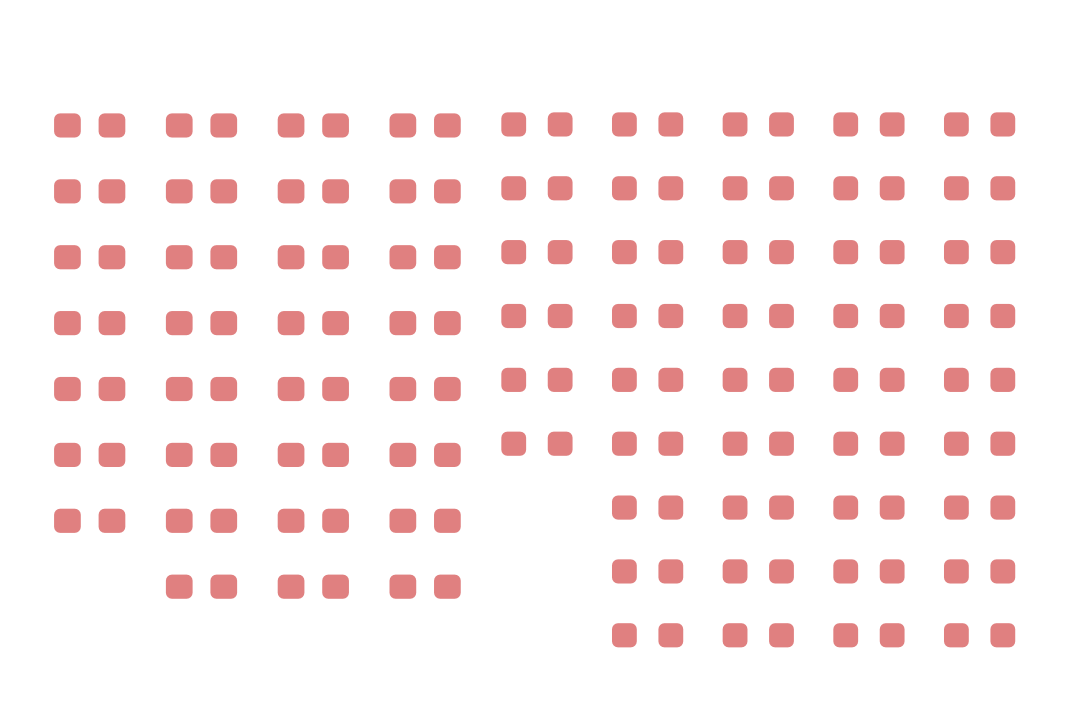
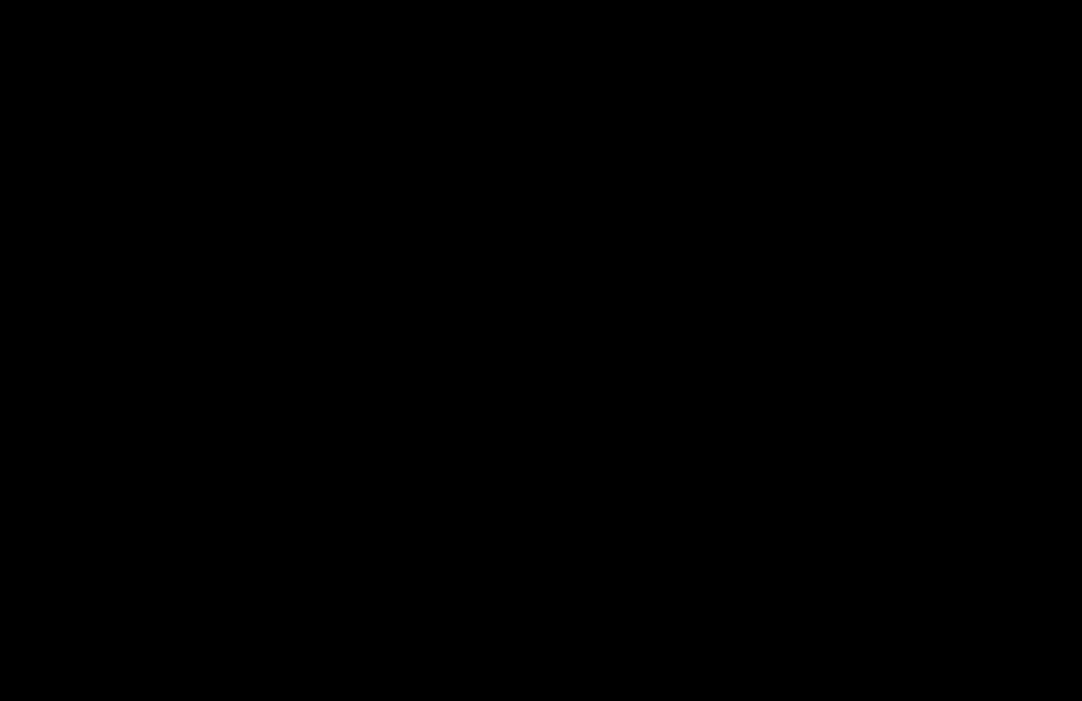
part: (536, 124) -> none
part: (647, 124) -> none
part: (758, 124) -> none
part: (868, 124) -> none
part: (979, 124) -> none
part: (89, 125) -> none
part: (201, 125) -> none
part: (313, 125) -> none
part: (425, 125) -> none
part: (536, 188) -> none
part: (647, 188) -> none
part: (758, 188) -> none
part: (868, 188) -> none
part: (979, 188) -> none
part: (89, 191) -> none
part: (201, 191) -> none
part: (313, 191) -> none
part: (425, 191) -> none
part: (536, 252) -> none
part: (647, 252) -> none
part: (758, 252) -> none
part: (868, 252) -> none
part: (979, 252) -> none
part: (89, 257) -> none
part: (201, 257) -> none
part: (313, 257) -> none
part: (425, 257) -> none
part: (536, 316) -> none
part: (647, 316) -> none
part: (758, 316) -> none
part: (868, 316) -> none
part: (979, 316) -> none
part: (89, 323) -> none
part: (201, 323) -> none
part: (313, 323) -> none
part: (425, 323) -> none
part: (536, 379) -> none
part: (647, 379) -> none
part: (758, 379) -> none
part: (868, 379) -> none
part: (979, 379) -> none
part: (89, 389) -> none
part: (201, 389) -> none
part: (313, 389) -> none
part: (425, 389) -> none
part: (536, 443) -> none
part: (647, 443) -> none
part: (758, 443) -> none
part: (868, 443) -> none
part: (979, 443) -> none
part: (89, 454) -> none
part: (201, 454) -> none
part: (313, 454) -> none
part: (425, 454) -> none
part: (647, 507) -> none
part: (758, 507) -> none
part: (868, 507) -> none
part: (979, 507) -> none
part: (89, 520) -> none
part: (201, 520) -> none
part: (313, 520) -> none
part: (425, 520) -> none
part: (647, 571) -> none
part: (758, 571) -> none
part: (868, 571) -> none
part: (979, 571) -> none
part: (201, 586) -> none
part: (313, 586) -> none
part: (425, 586) -> none
part: (647, 635) -> none
part: (758, 635) -> none
part: (868, 635) -> none
part: (979, 635) -> none

